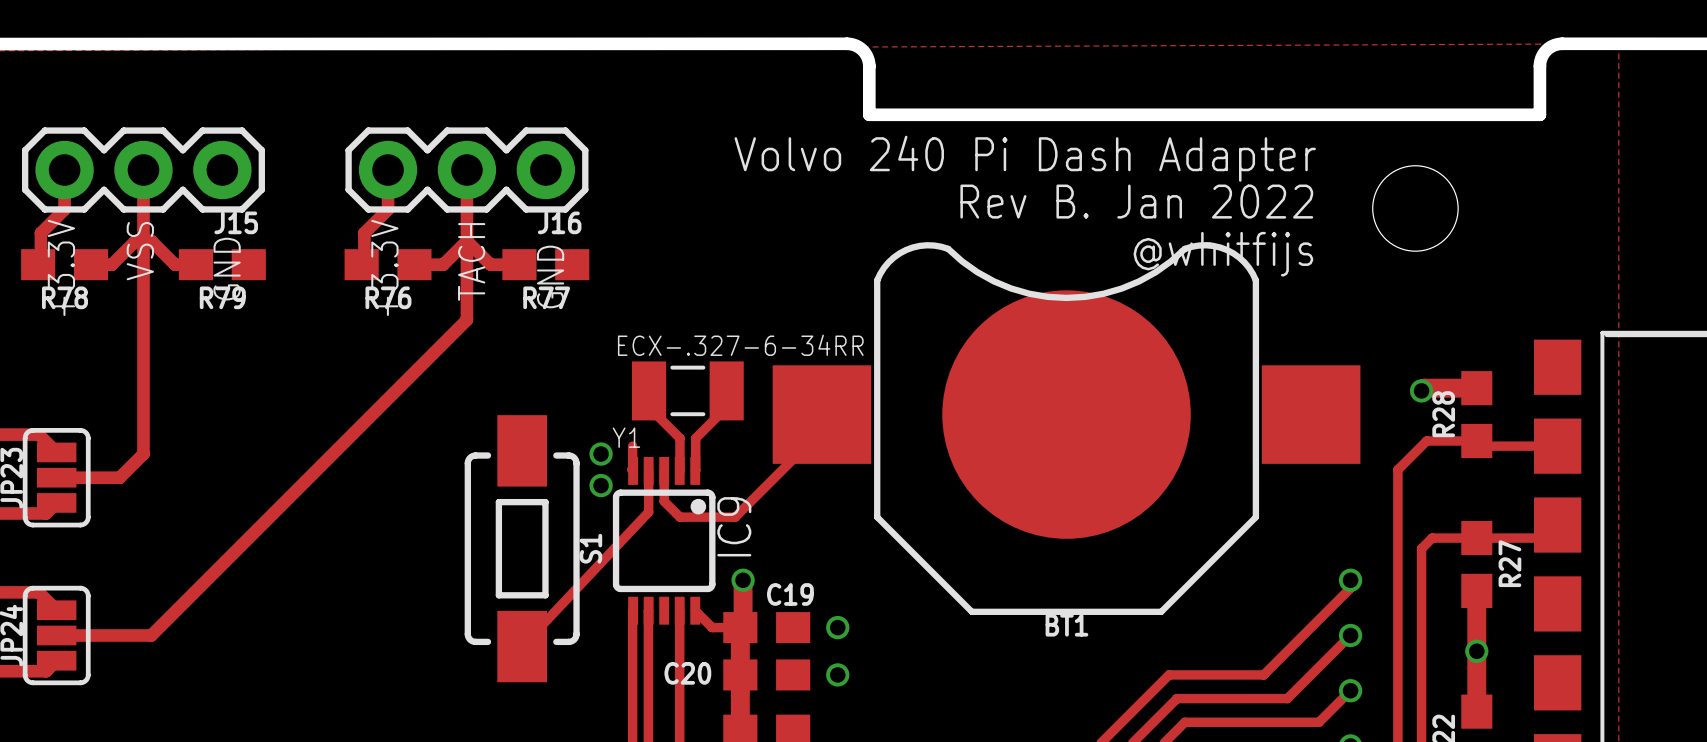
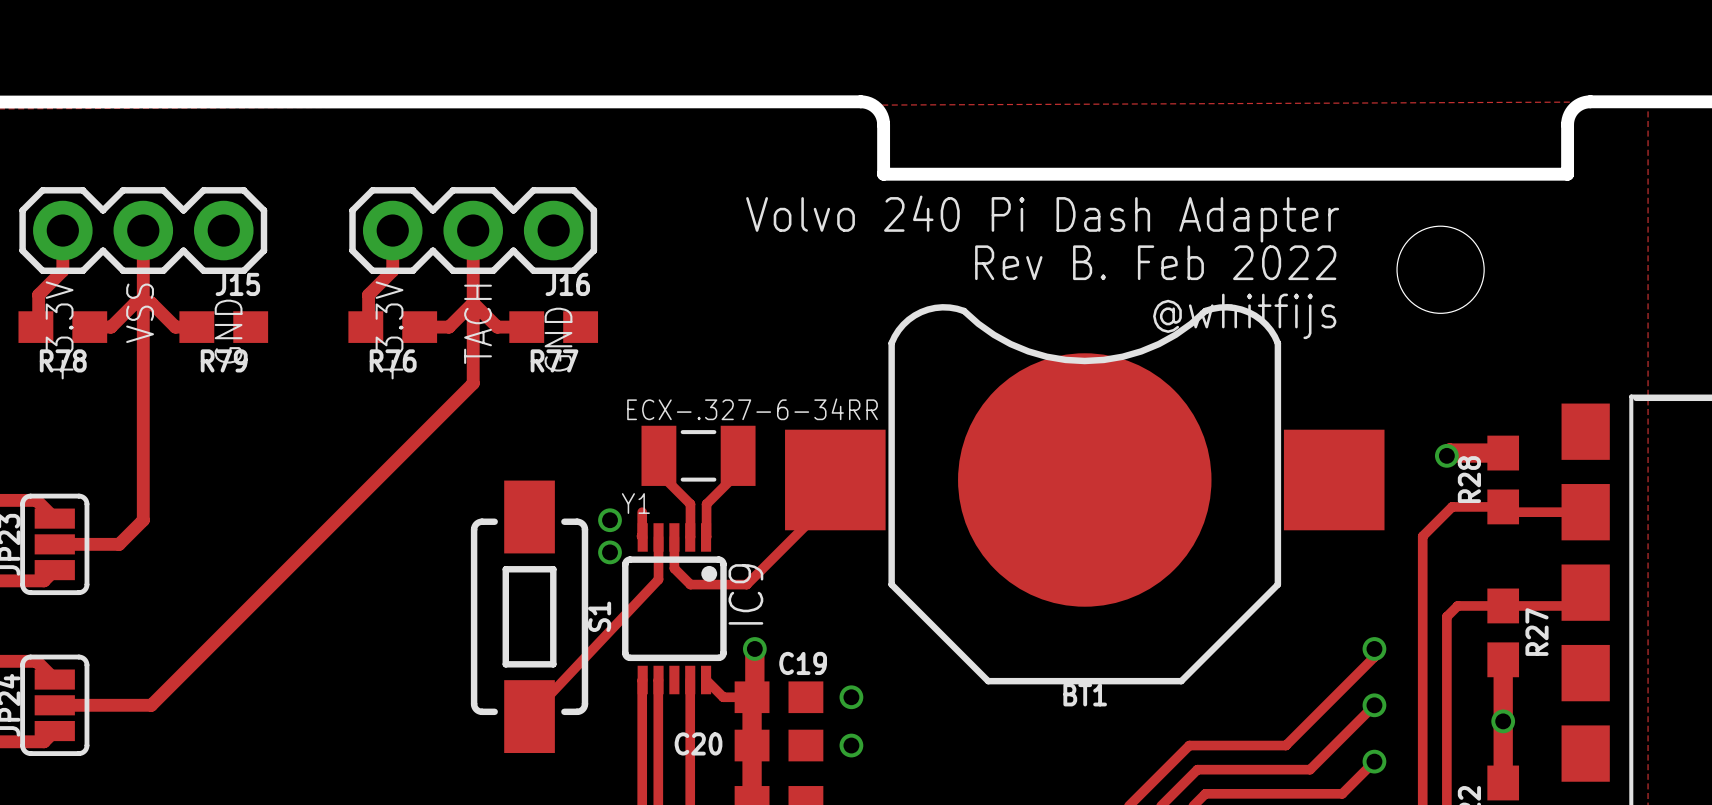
text: Rev B. Jan 2022 (1136, 201) -> Rev B. Feb 2022 (1155, 262)

